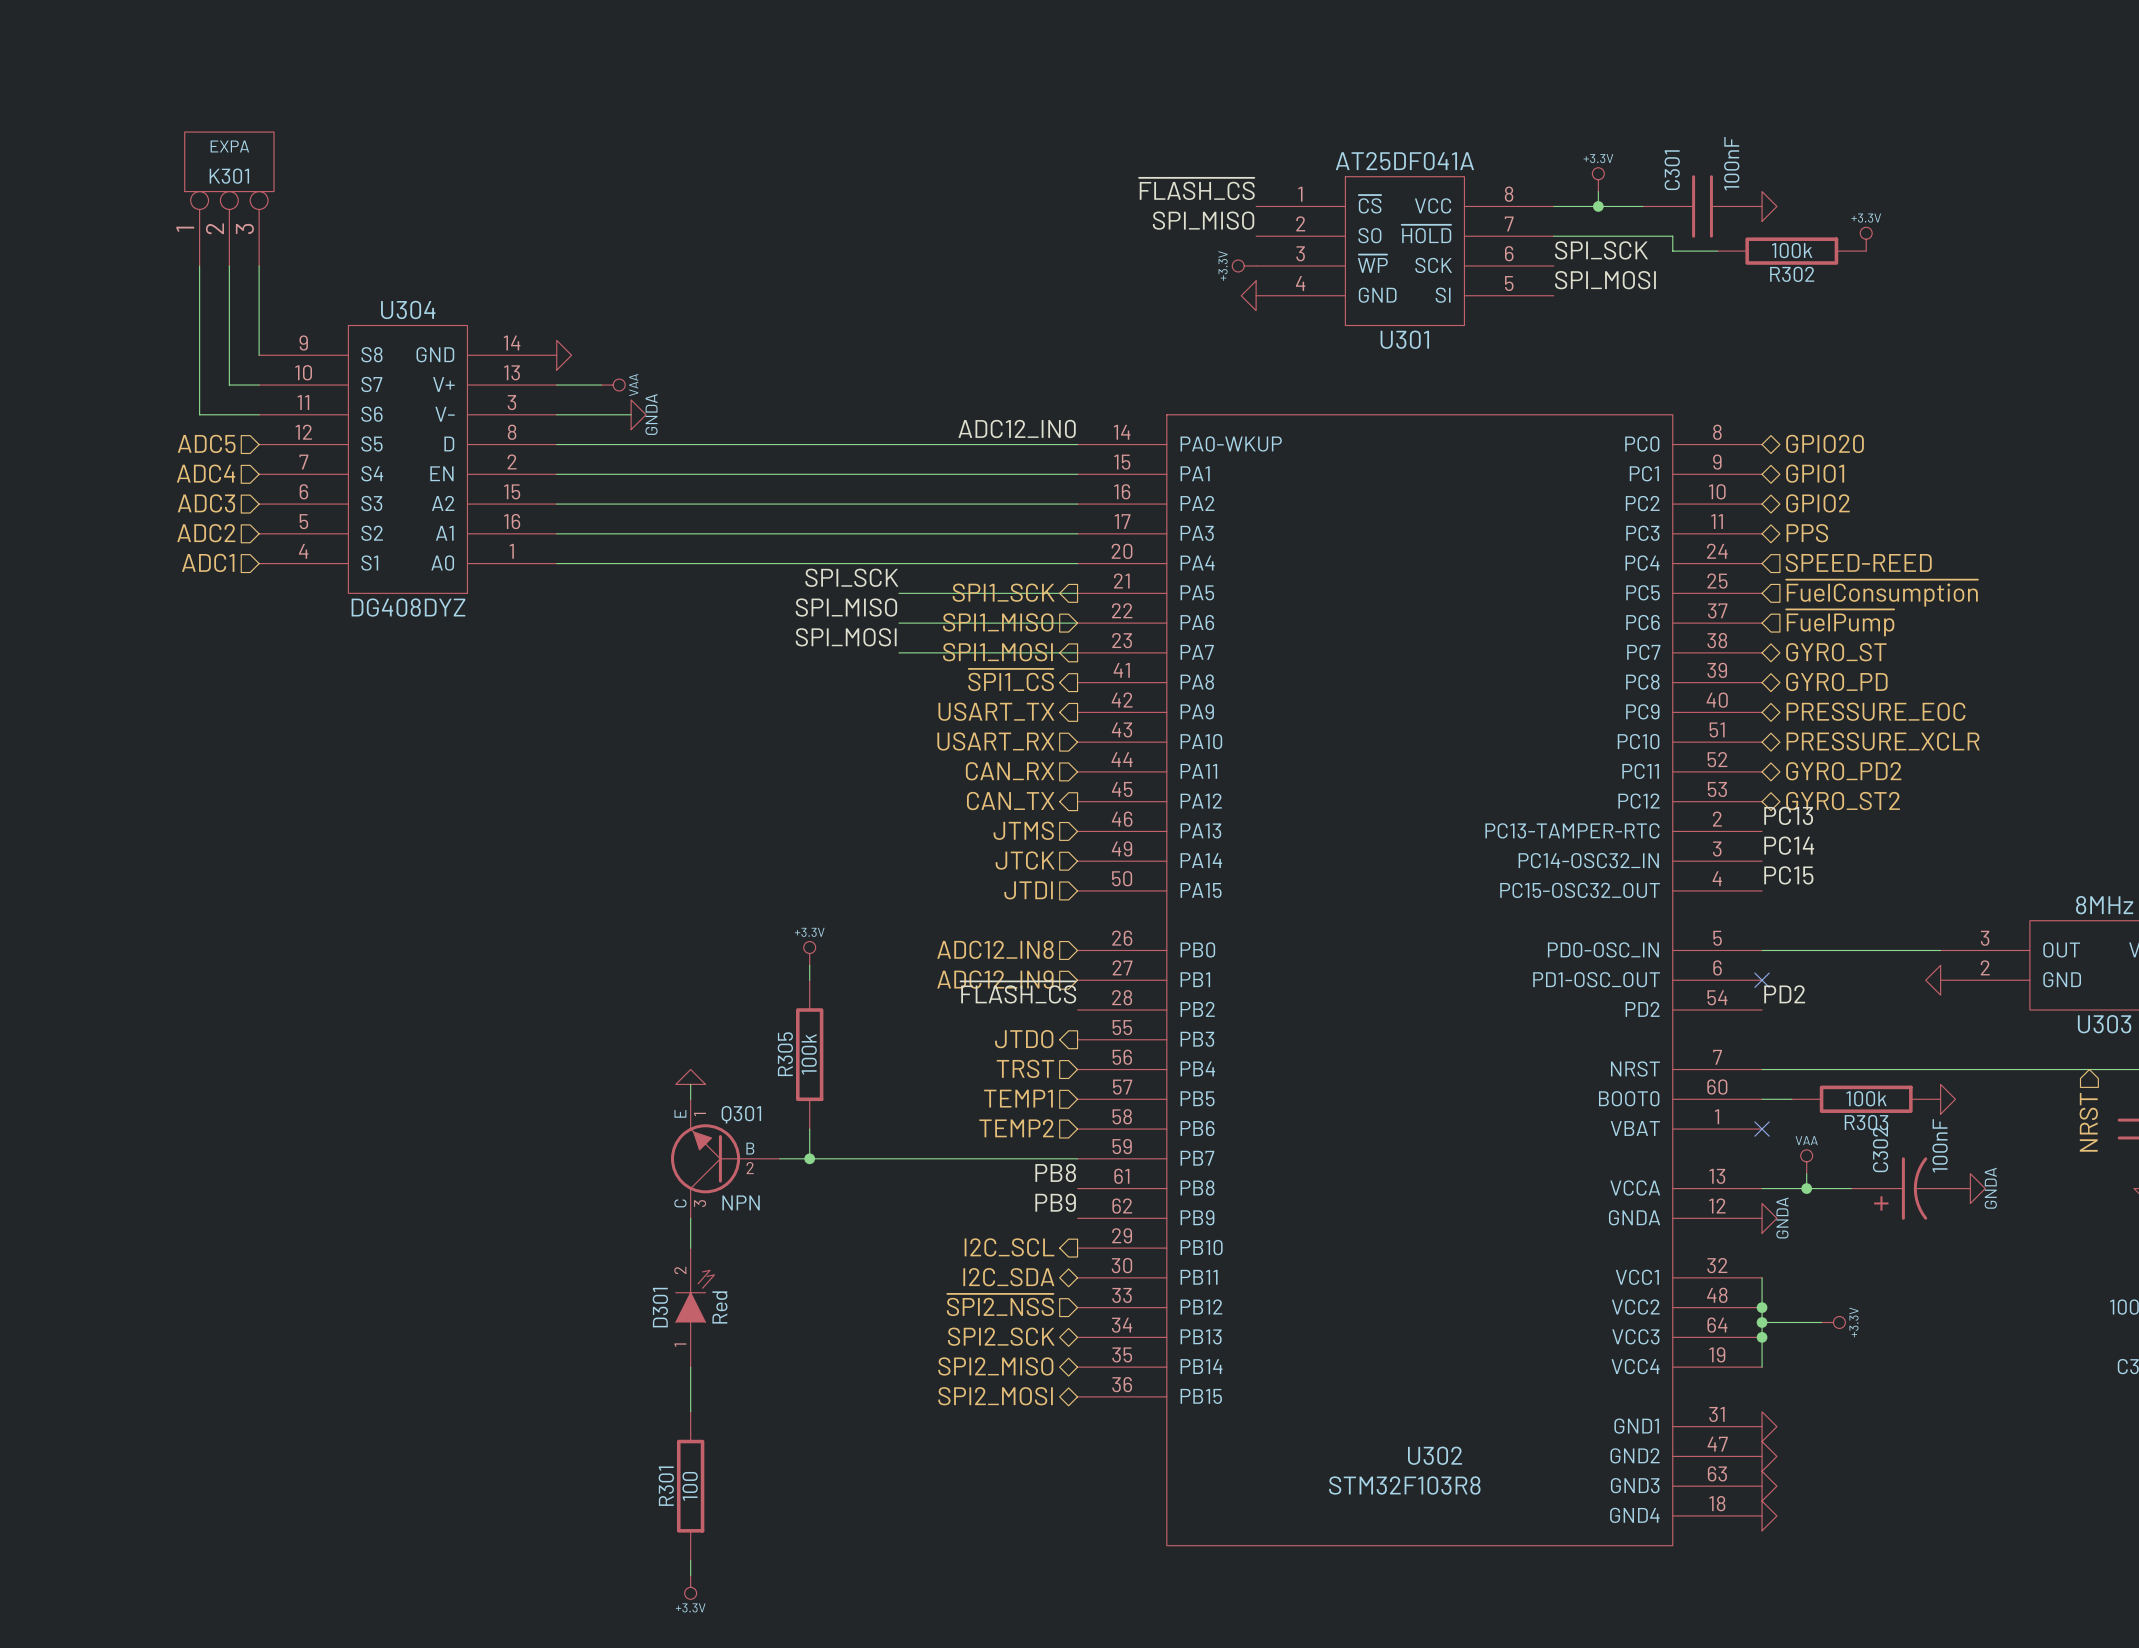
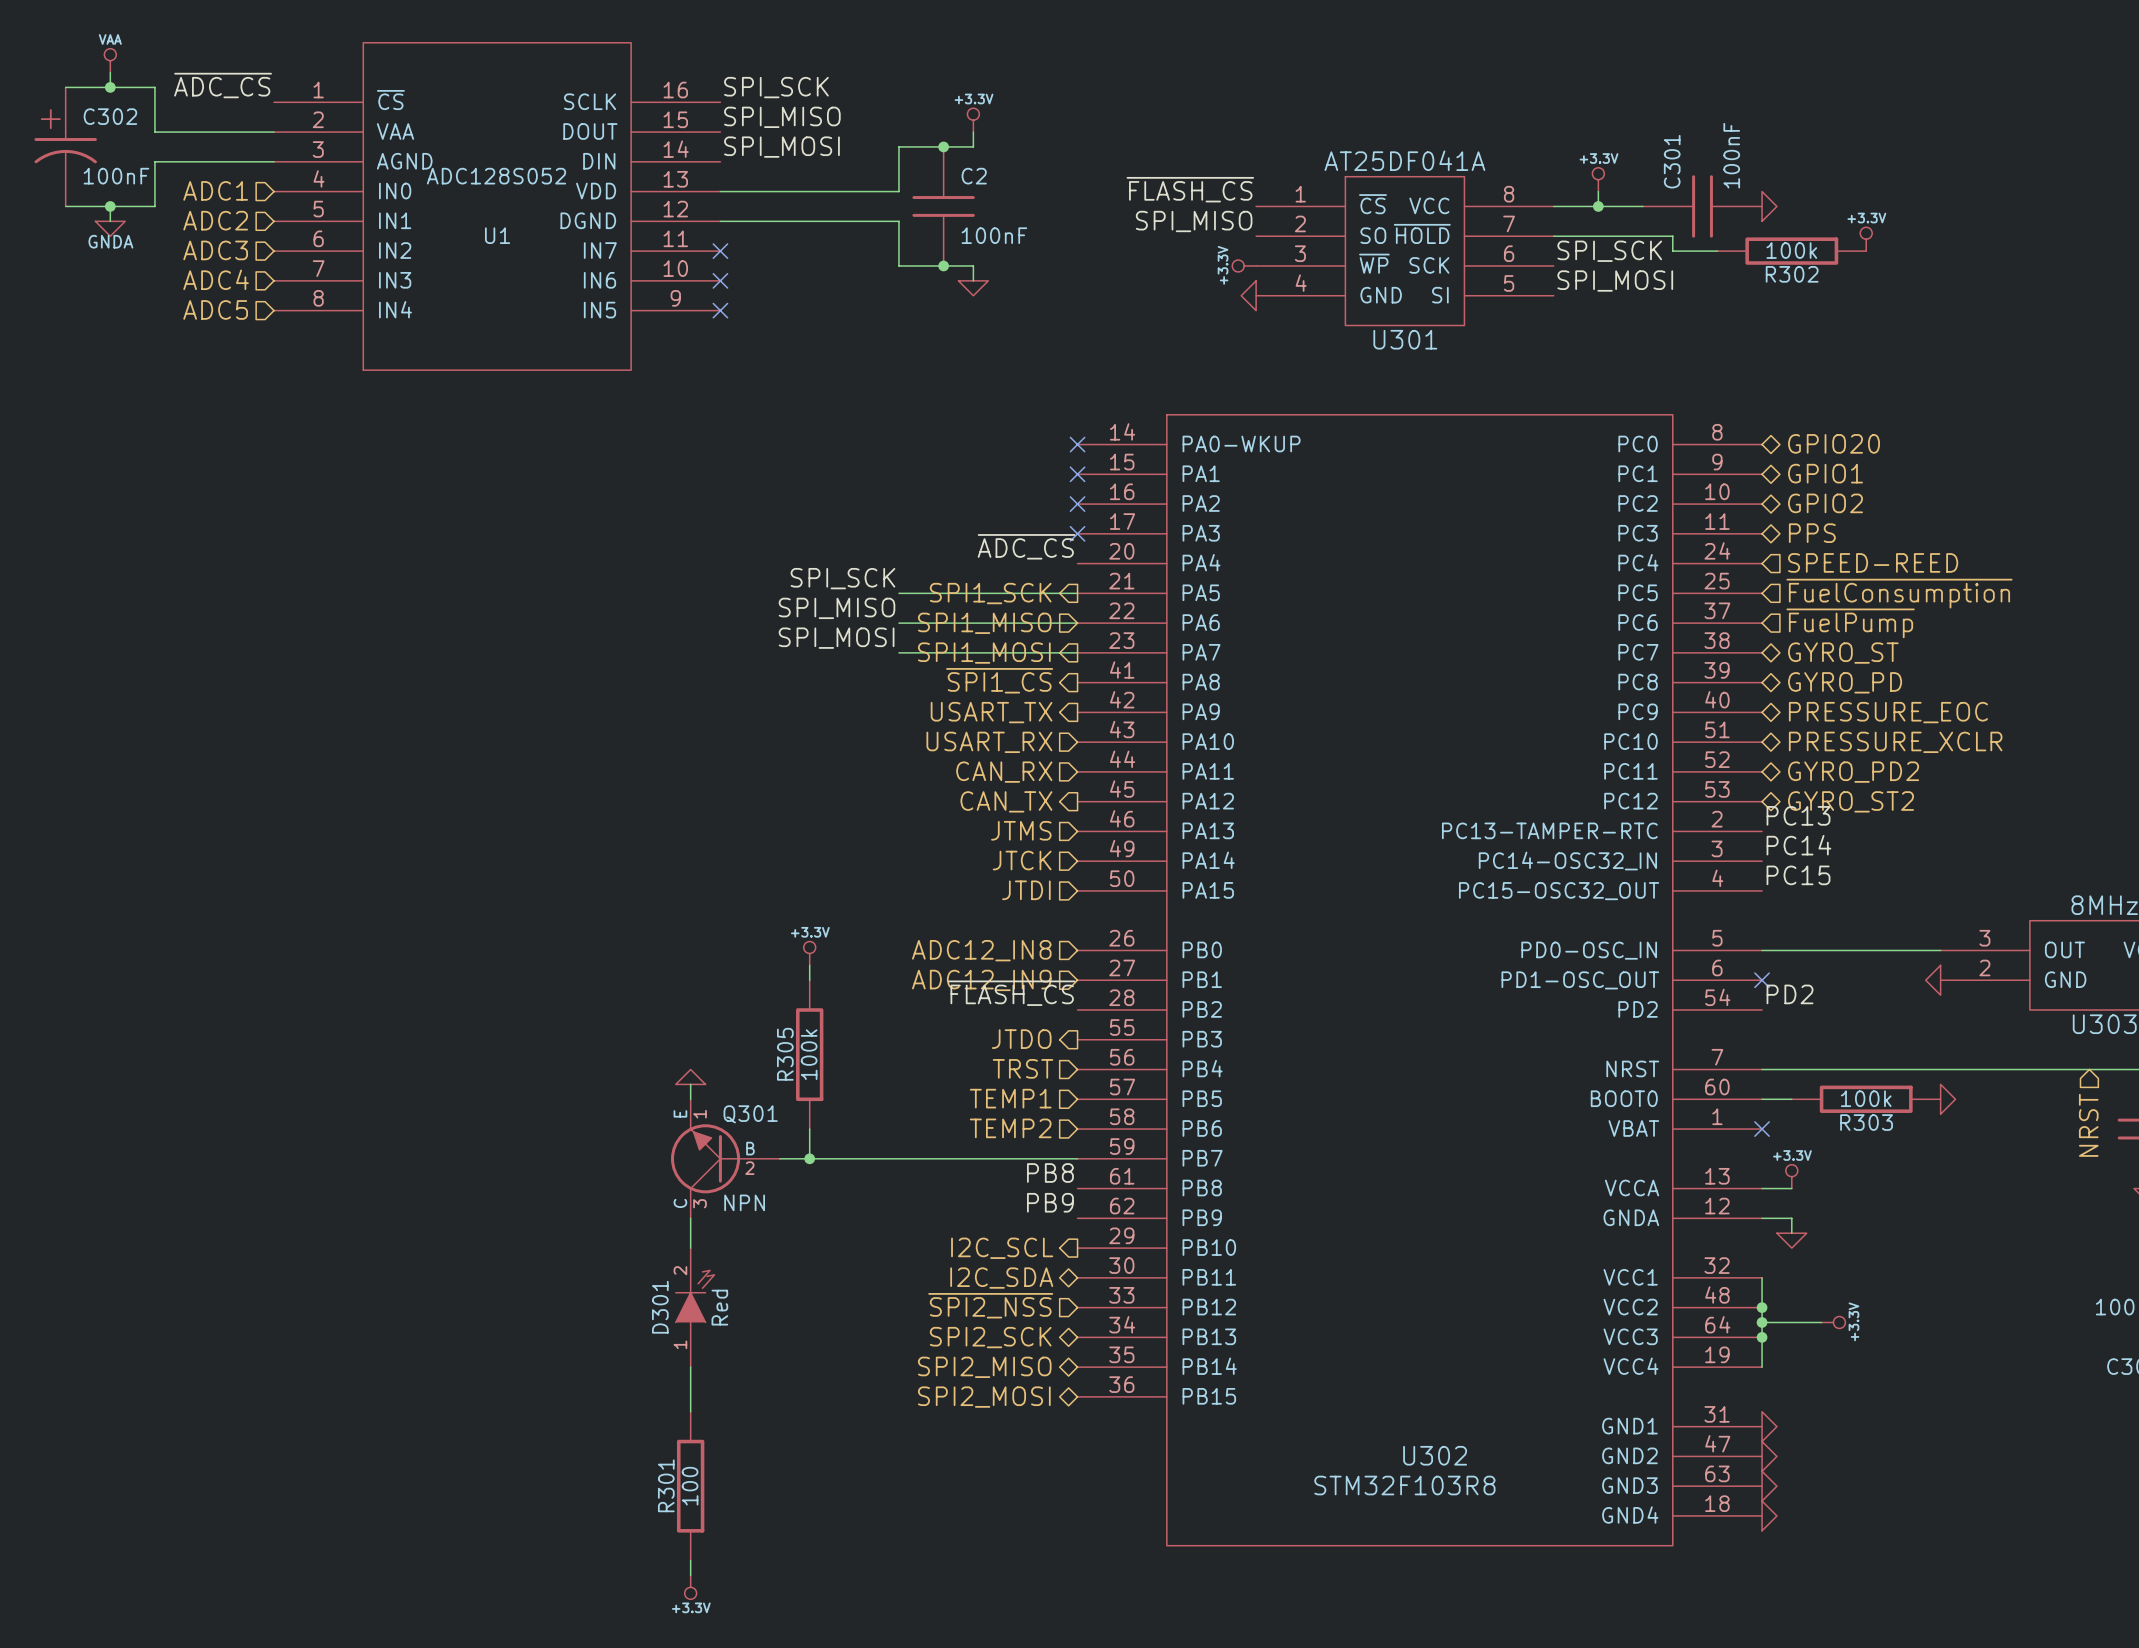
power symbol: none -> VAA (110, 60)
wire: none -> (110, 72) (110, 87)
label: none -> ~{ADC_CS} (223, 85)
label: none -> SPI_SCK (776, 87)
wire: none -> (65, 87) (154, 87) (154, 132) (274, 132)
junction: none -> (110, 87)
label: none -> SPI_MISO (782, 117)
power symbol: none -> +3.3V (973, 120)
wire: none -> (973, 132) (973, 146) (898, 146) (898, 191) (720, 191)
label: none -> SPI_MOSI (781, 147)
junction: none -> (943, 146)
wire: none -> (274, 161) (154, 161) (154, 206) (65, 206)
hierarchical label: none -> ADC1 (215, 190)
K301: EXPA (229, 199) -> none
wire: none -> (110, 206) (110, 221)
junction: none -> (110, 206)
U1: none -> ADC128S052 (497, 206)
C2: none -> 100nF (943, 206)
hierarchical label: none -> ADC2 (215, 220)
wire: none -> (720, 221) (898, 221) (898, 265) (973, 265) (973, 280)
power symbol: none -> GNDA (110, 228)
no-connect mark: none -> (720, 251)
wire: (199, 265) (199, 414) (259, 414) -> none
wire: (229, 265) (229, 385) (259, 385) -> none
wire: (259, 265) (259, 355) -> none
junction: none -> (943, 265)
no-connect mark: none -> (720, 280)
power symbol: none -> (973, 288)
no-connect mark: none -> (720, 310)
power symbol: (564, 355) -> none
wire: (556, 385) (601, 385) -> none
power symbol: VAA (613, 385) -> none
wire: (556, 414) (631, 414) -> none
power symbol: GNDA (638, 414) -> none
label: ADC12_IN0 (1017, 428) -> none
hierarchical label position: ADC5 (206, 443) -> ADC5 (215, 309)
wire: (556, 444) (1077, 444) -> none
no-connect mark: none -> (1077, 444)
U304: DG408DYZ (407, 459) -> none
hierarchical label position: ADC4 (206, 473) -> ADC4 (216, 279)
wire: (556, 474) (1077, 474) -> none
no-connect mark: none -> (1077, 474)
hierarchical label position: ADC3 (206, 503) -> ADC3 (215, 250)
wire: (556, 504) (1077, 504) -> none
no-connect mark: none -> (1077, 504)
hierarchical label: ADC2 (206, 533) -> none
wire: (556, 533) (1077, 533) -> none
no-connect mark: none -> (1077, 533)
label: none -> ~{ADC_CS} (1026, 546)
hierarchical label: ADC1 (208, 562) -> none
wire: (556, 563) (1077, 563) -> none
power symbol: VAA (1806, 1161) -> none
wire: (1806, 1173) (1806, 1188) -> none
power symbol: none -> +3.3V (1791, 1176)
wire: (1791, 1188) (1851, 1188) -> none
junction: (1806, 1188) -> none
C302 position: (1910, 1188) -> (65, 146)
C302 rotation: 0° (1911, 1188) -> 90° clockwise (65, 147)
power symbol: GNDA (1977, 1188) -> none
wire: none -> (1762, 1218) (1791, 1218) (1791, 1233)
power symbol: GNDA (1769, 1218) -> none
power symbol: none -> (1791, 1240)

